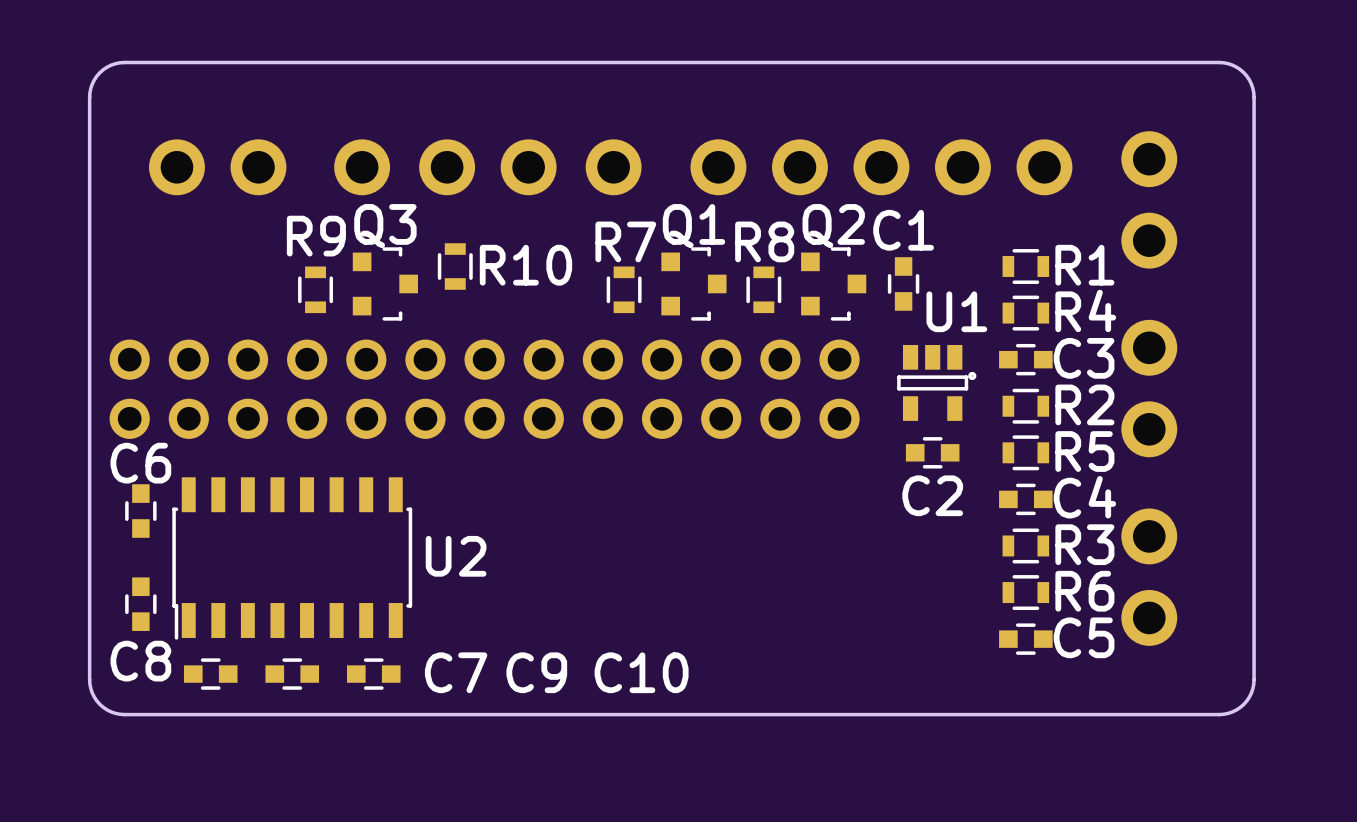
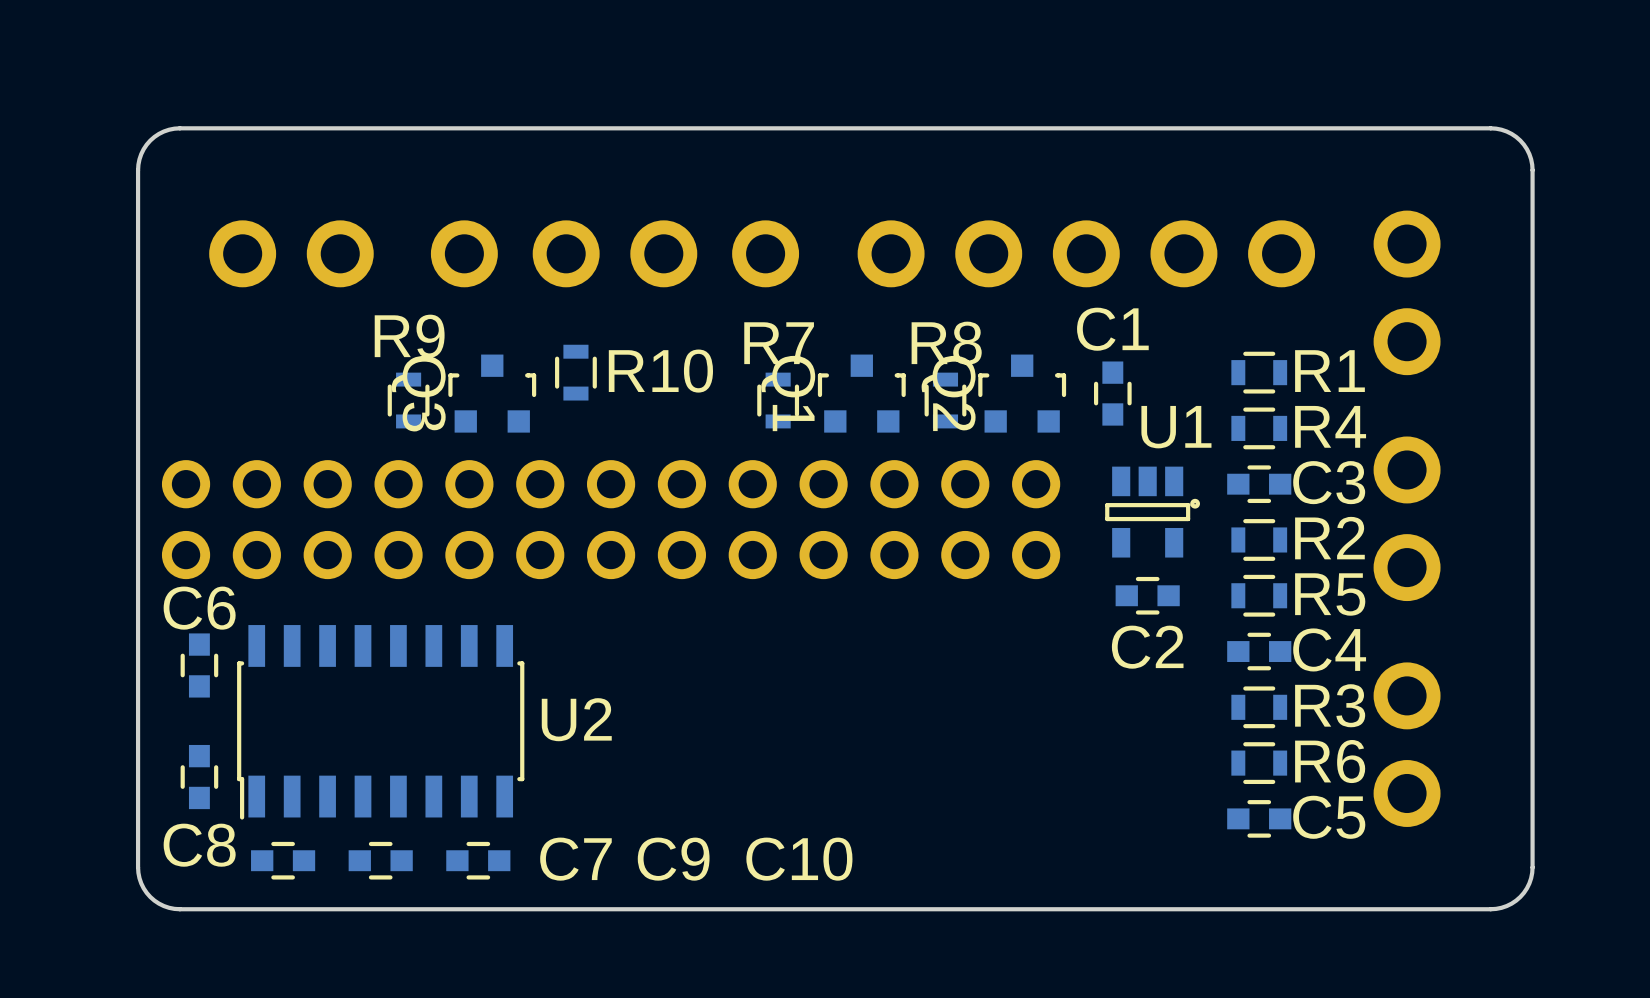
Q3 rotation: 0° (385, 283) -> 90° counterclockwise (492, 393)
Q1 rotation: 0° (693, 283) -> 90° counterclockwise (861, 393)
Q2 rotation: 0° (833, 283) -> 90° counterclockwise (1022, 393)

